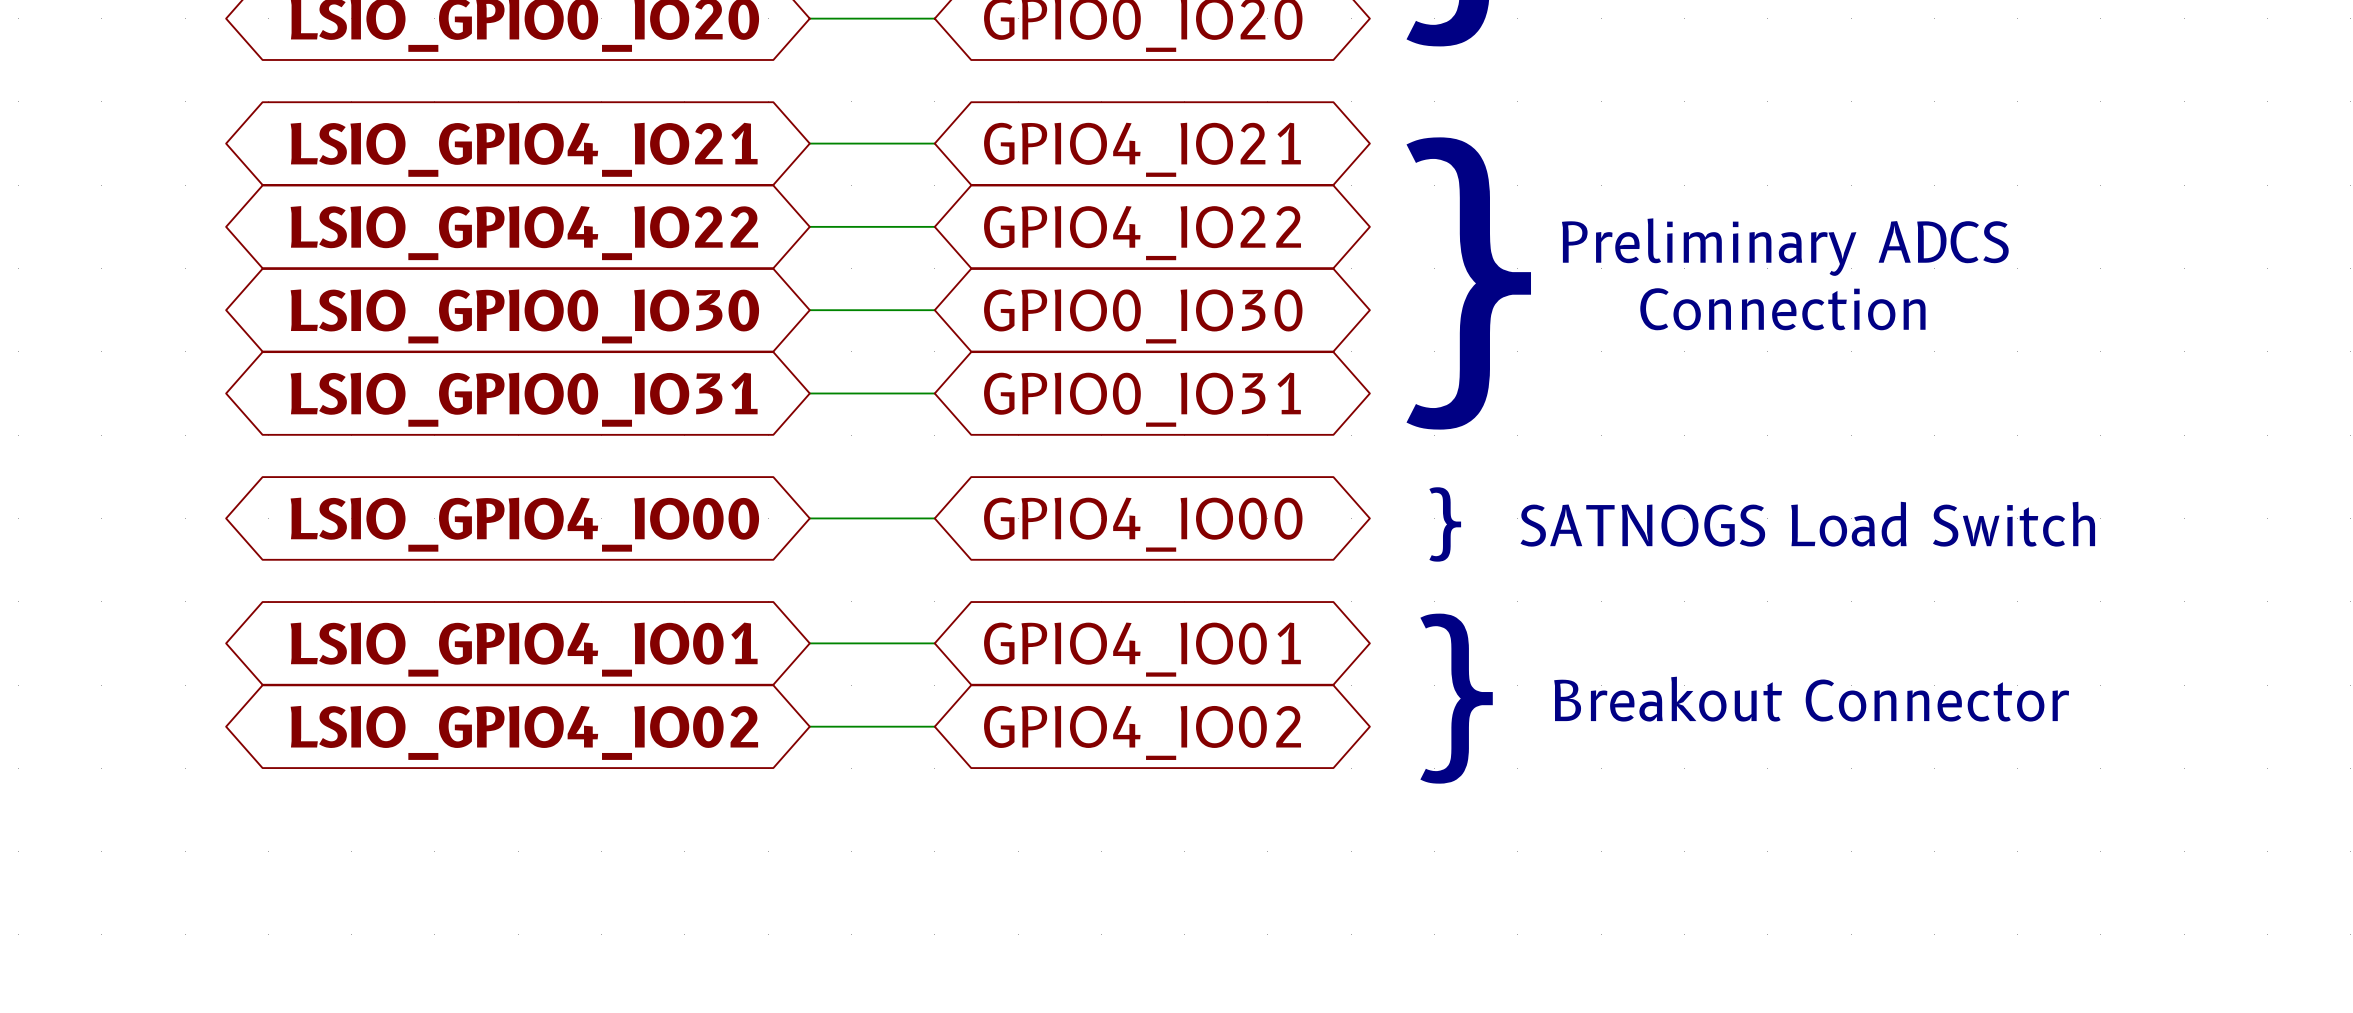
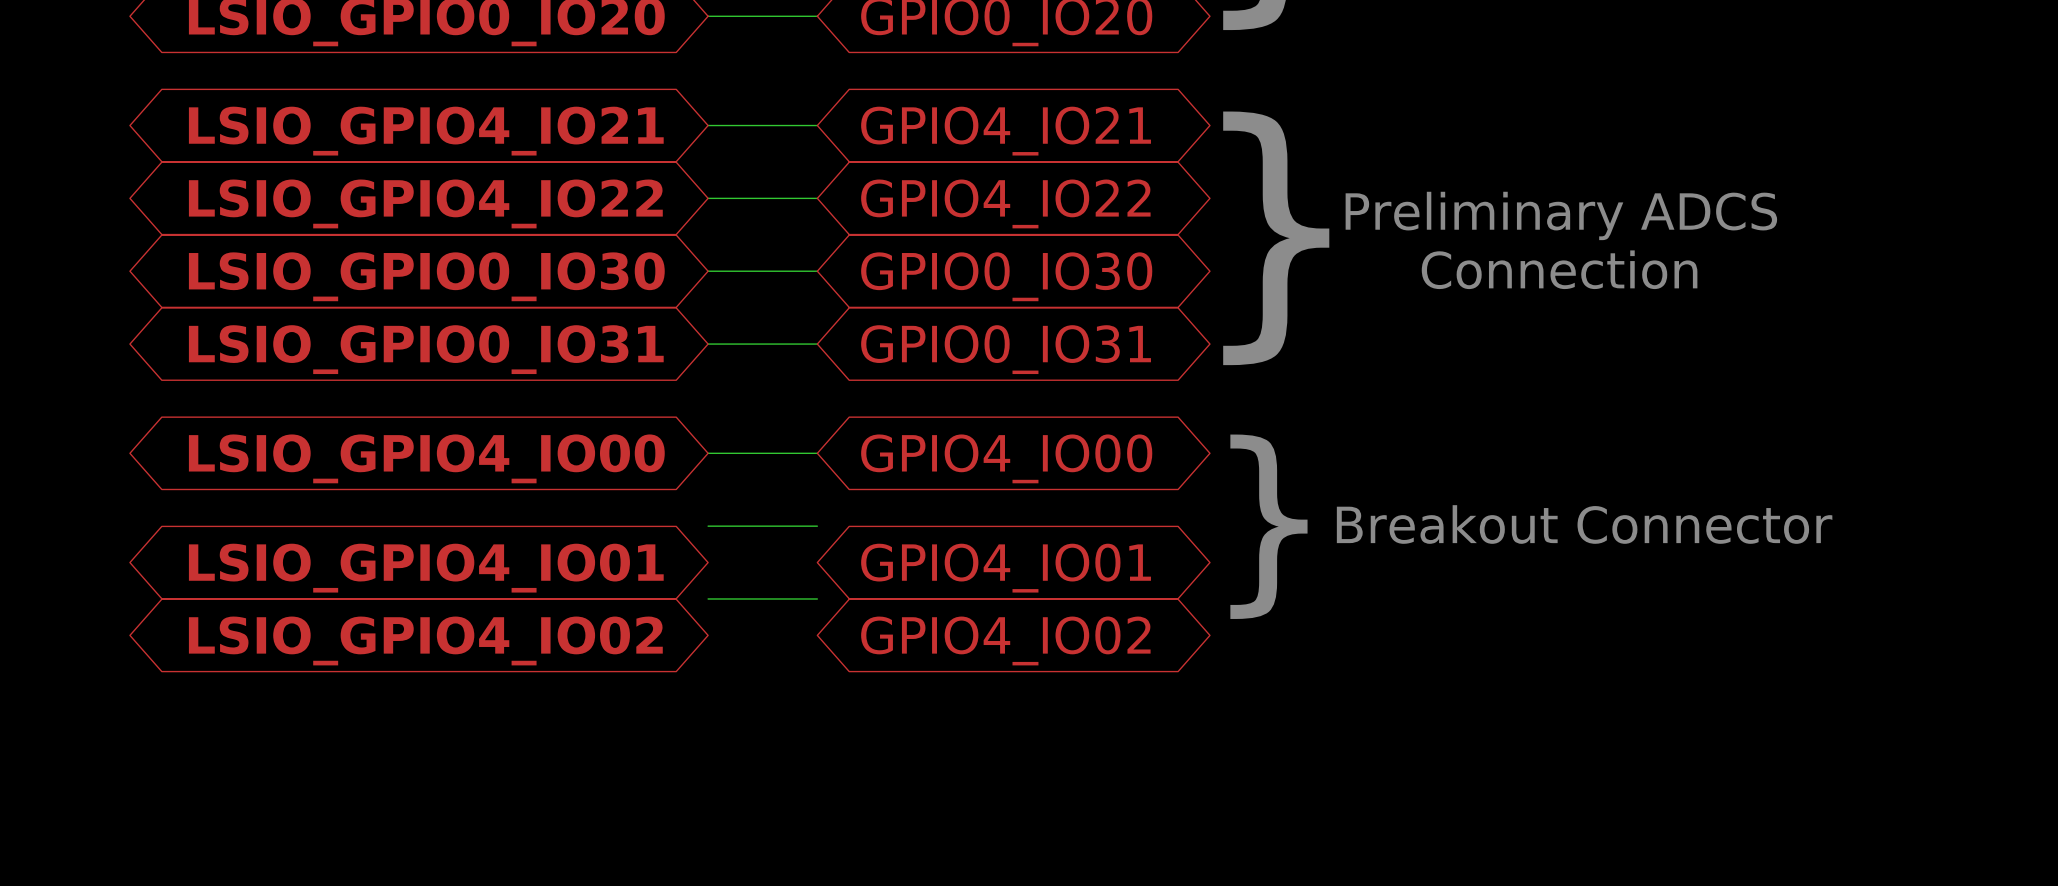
text: } (1445, 524) -> none
text: SATNOGS Load Switch (1807, 524) -> none
text: none -> } (1268, 526)
wire: (809, 643) (934, 643) -> (708, 526) (817, 526)
text: } (1456, 698) -> none
text position: Breakout Connector (1811, 699) -> Breakout Connector (1584, 524)
wire: (809, 726) (934, 726) -> (708, 598) (817, 598)

